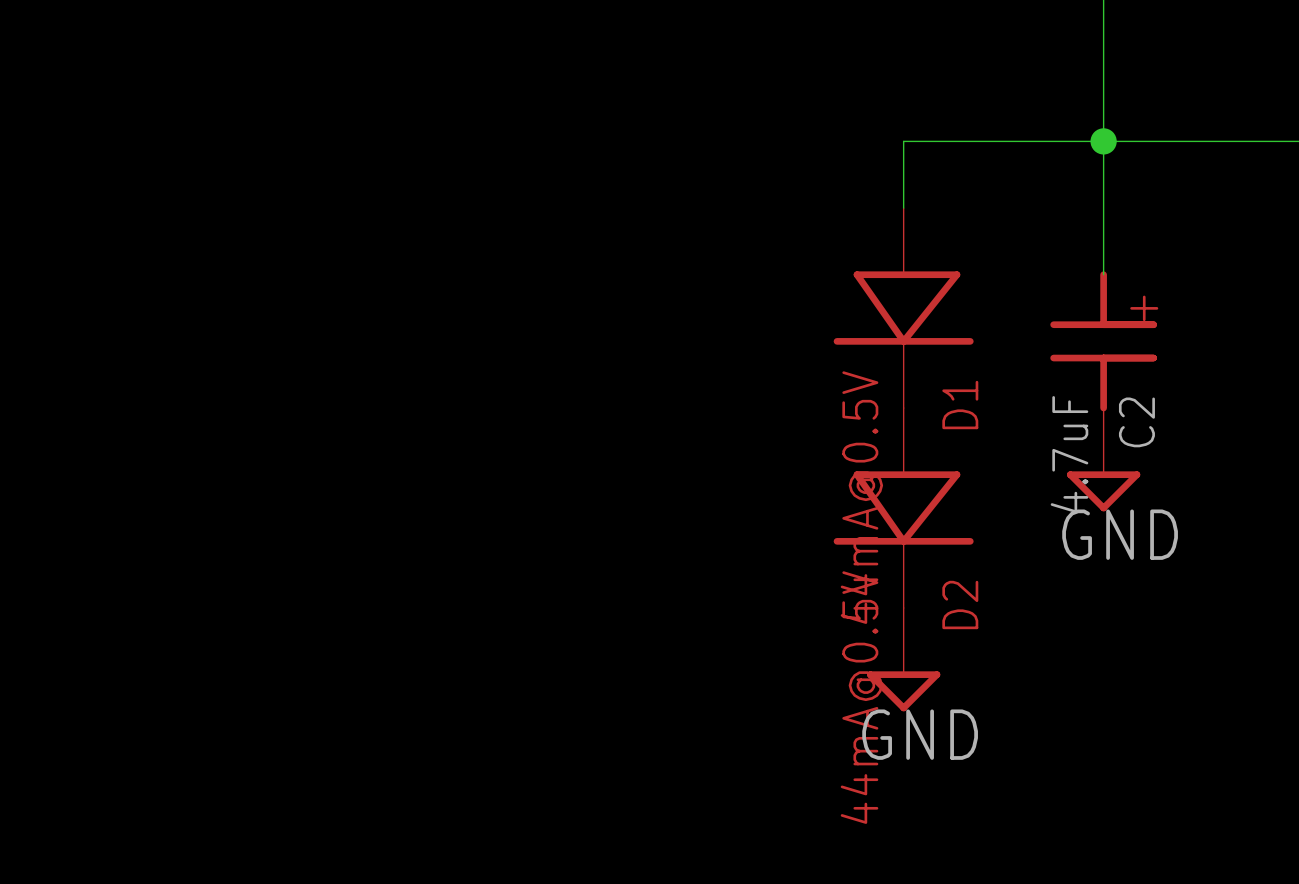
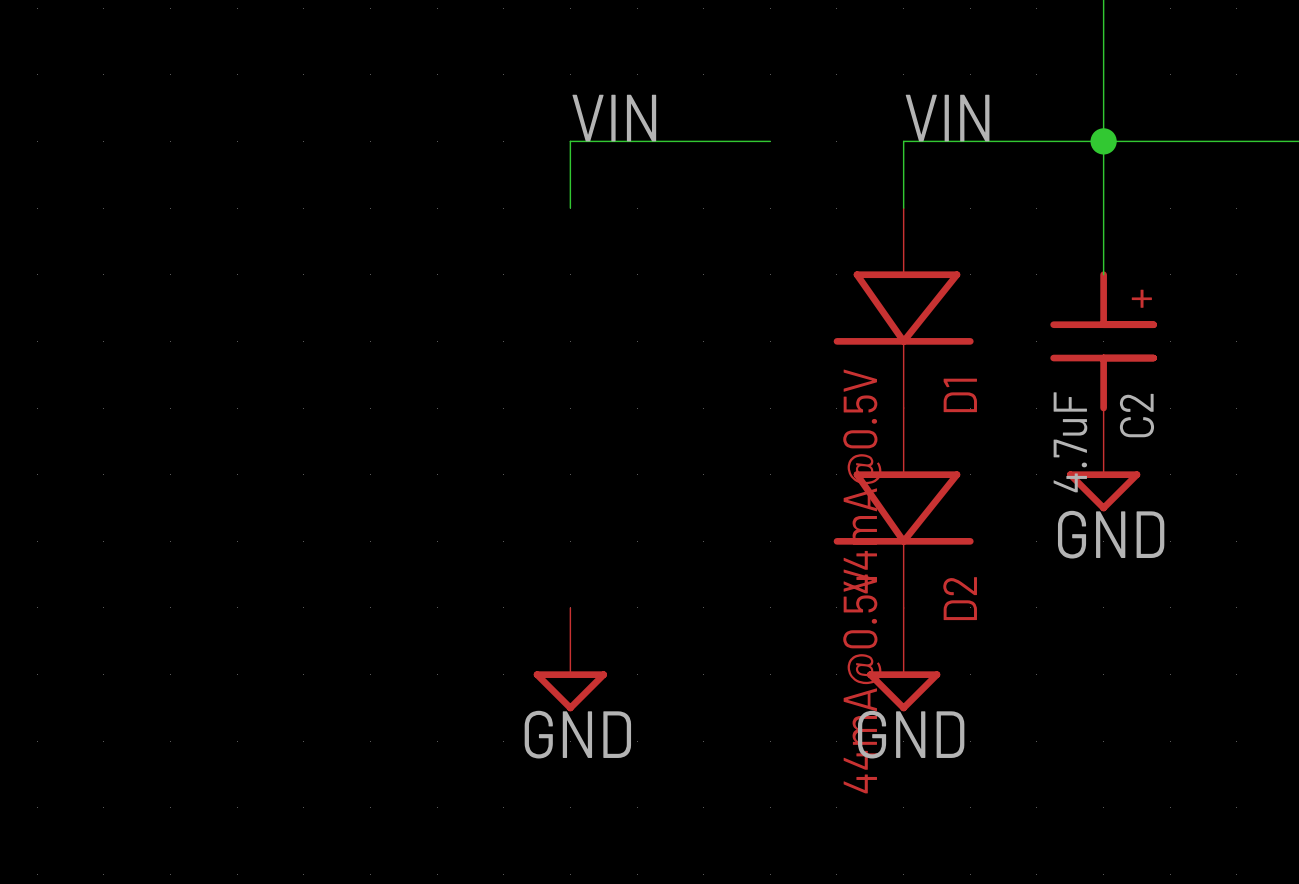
label: none -> VIN (614, 118)
label: none -> VIN (947, 118)
wire: none -> (770, 141) (570, 141) (570, 208)
power symbol: none -> GND (570, 659)

